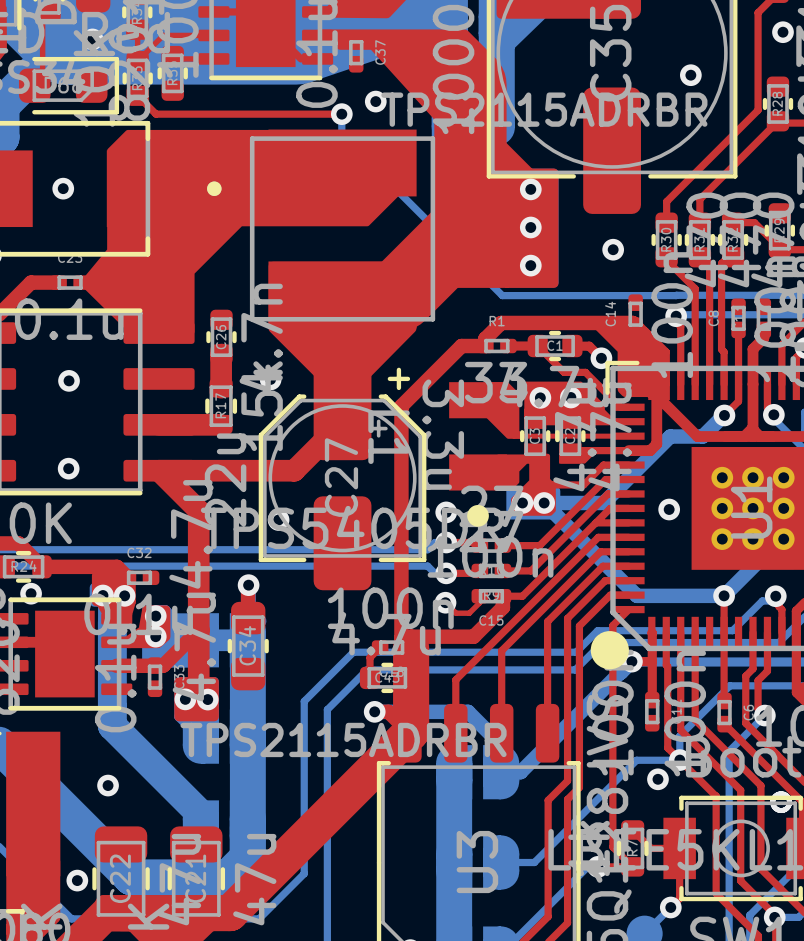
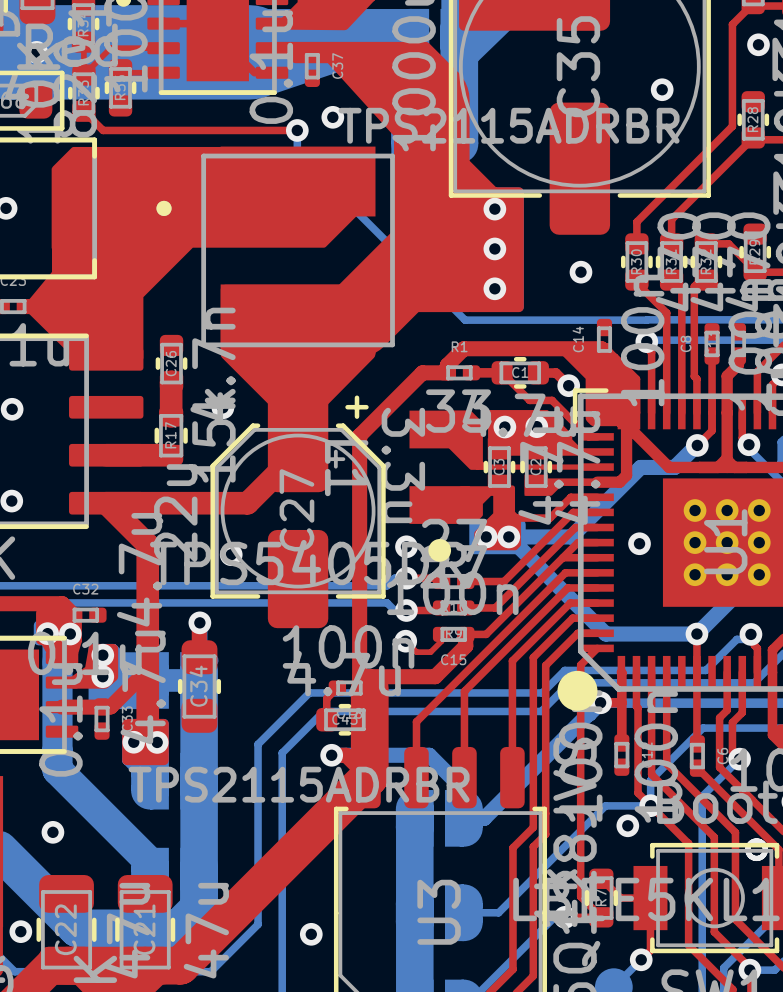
via: none -> (311, 934)

